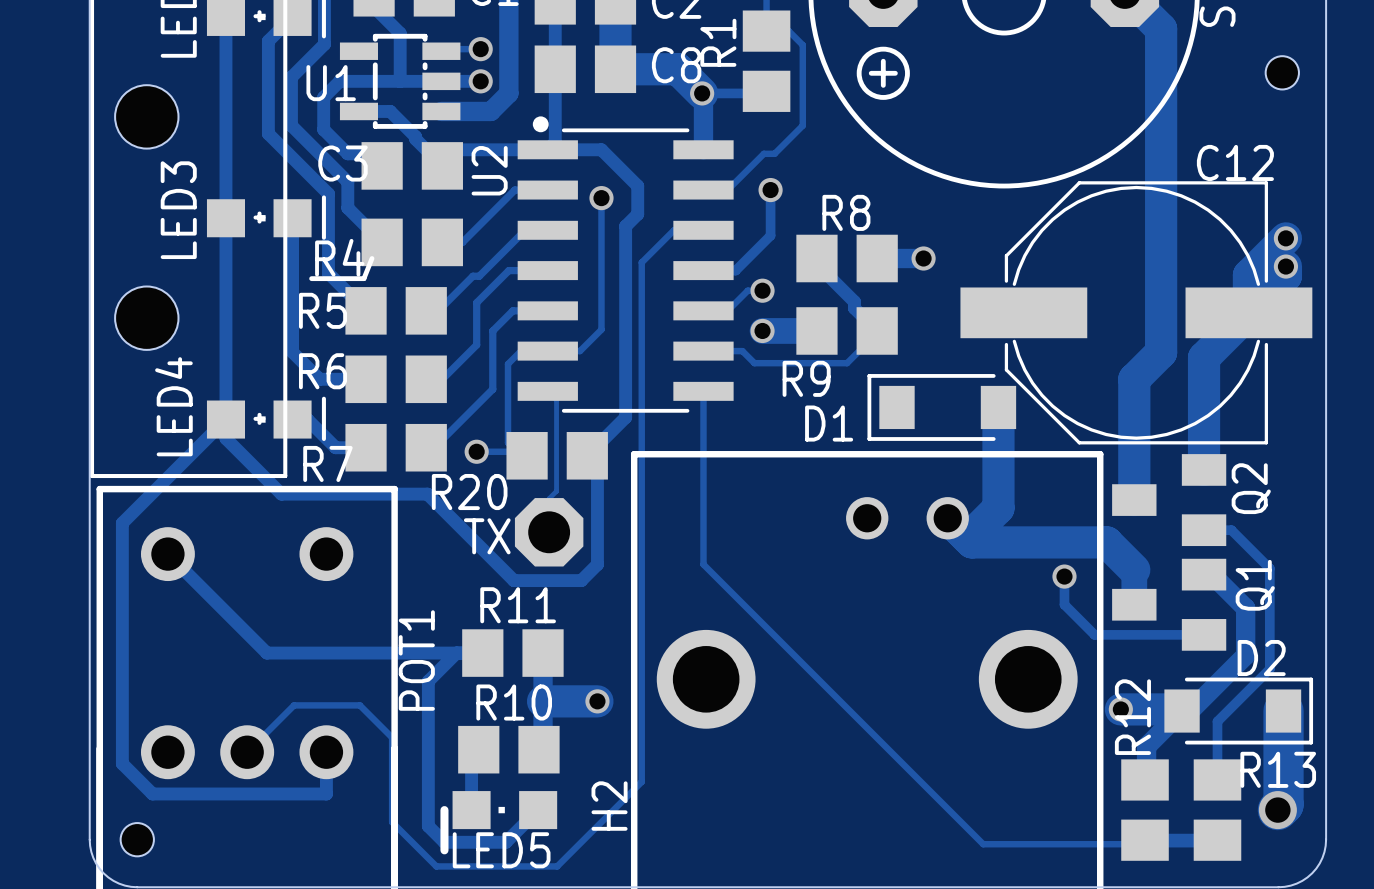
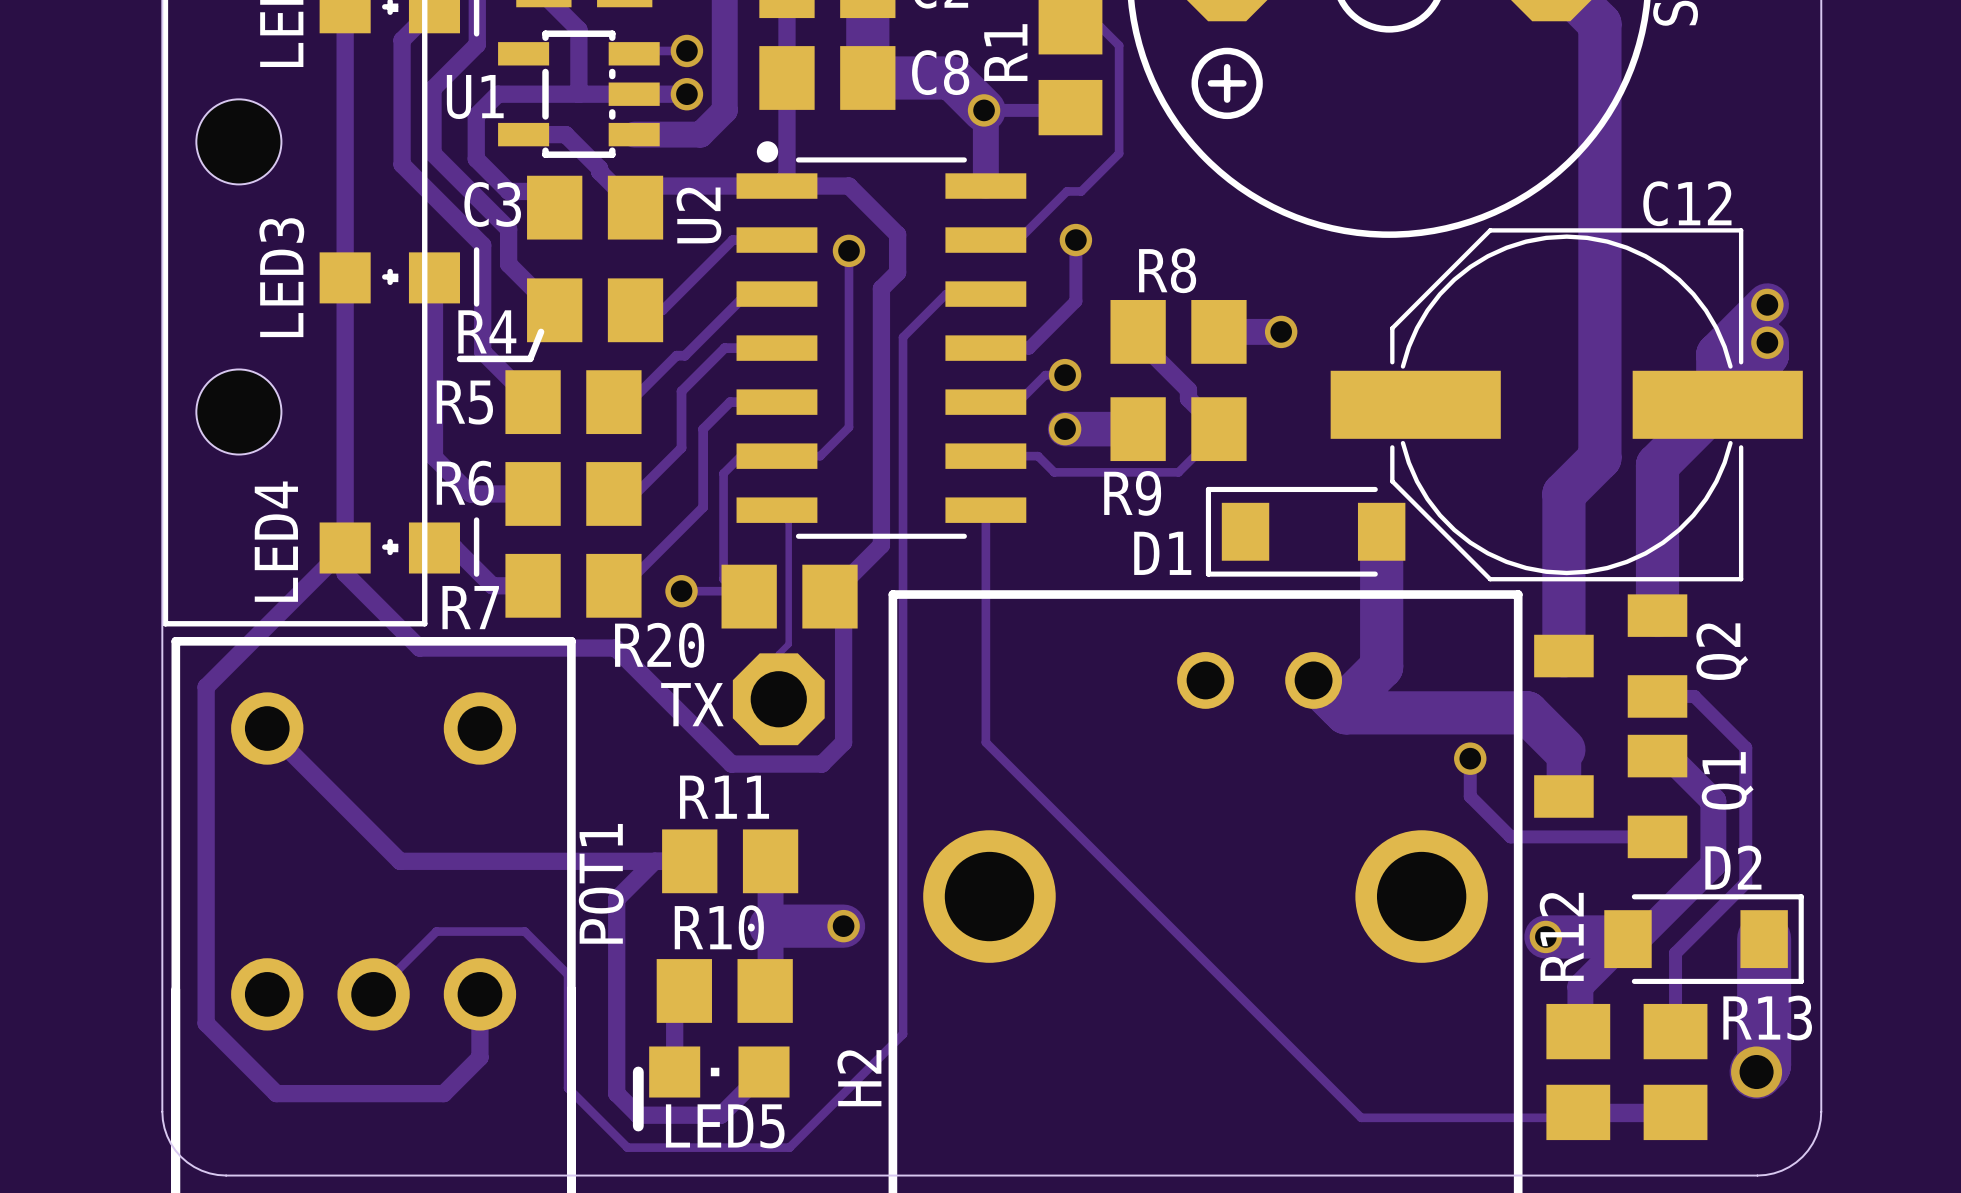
hole: (1282, 72) -> none
track: (122, 763) (152, 793) (326, 793) -> (206, 1009) (206, 1023) (276, 1093) (443, 1093) (479, 1057) (479, 1050)
hole: (137, 839) -> none

